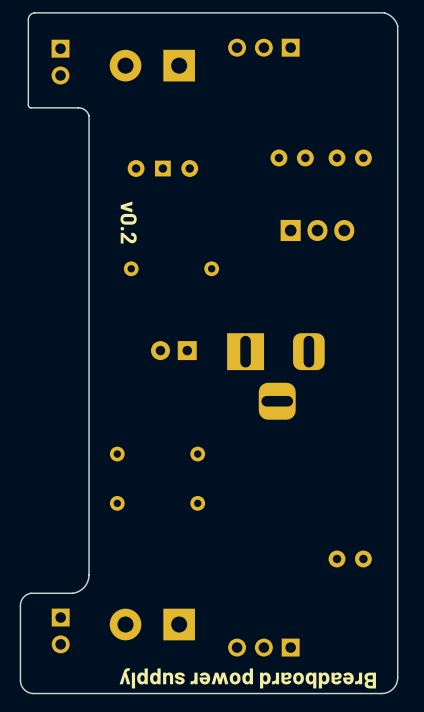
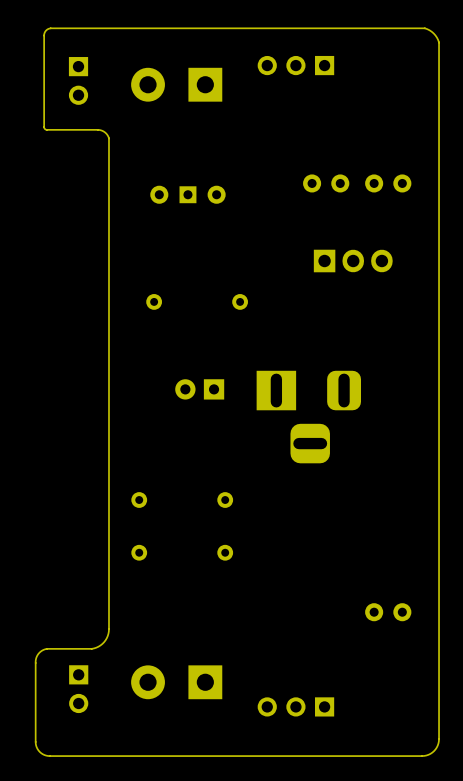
text: v0.2 (128, 222) -> none
text: Breadboard power supply (247, 678) -> none

